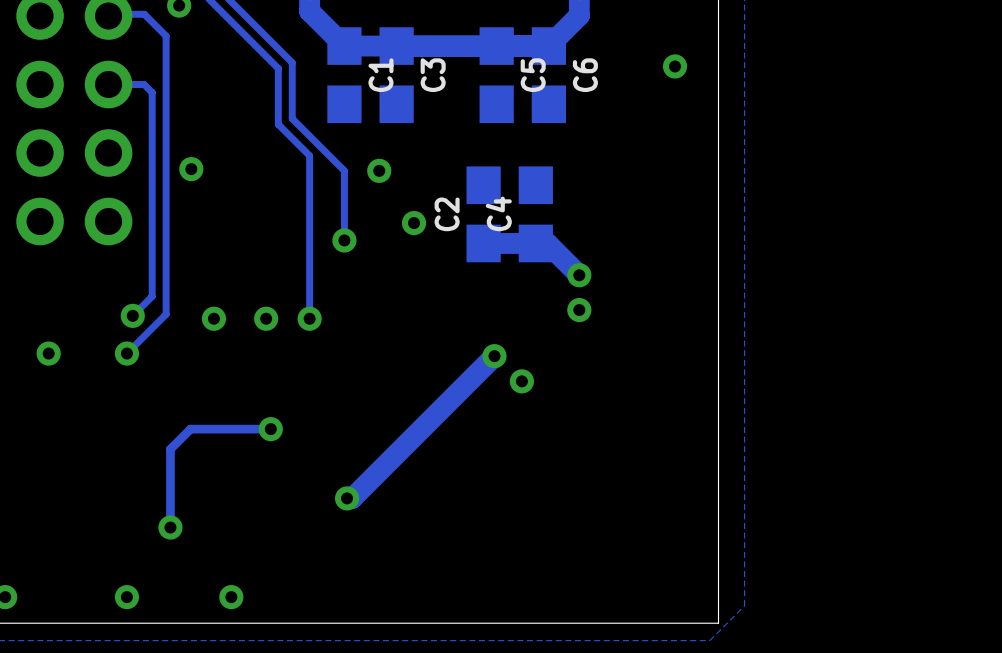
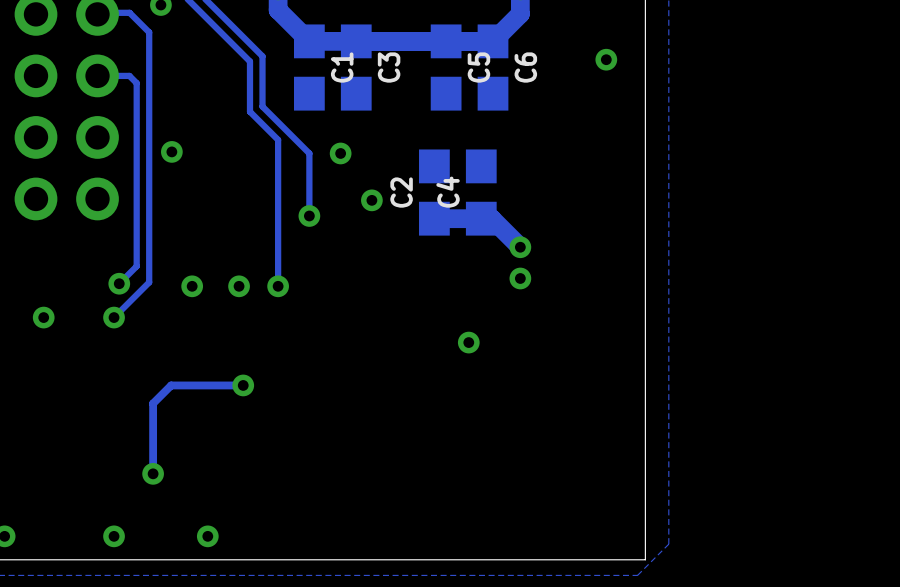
track: (494, 356) (352, 498) (347, 498) -> none
via: (494, 356) -> none
via: (347, 498) -> none

